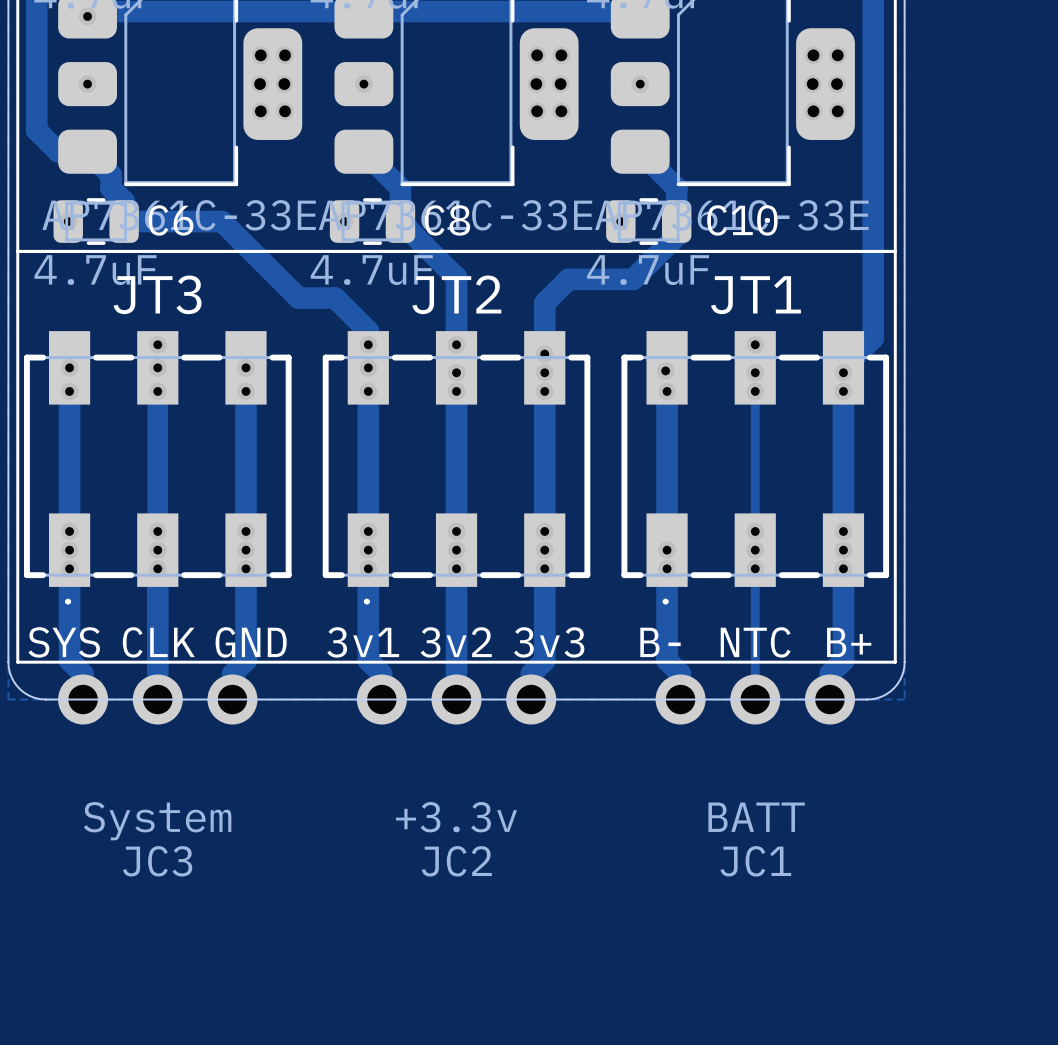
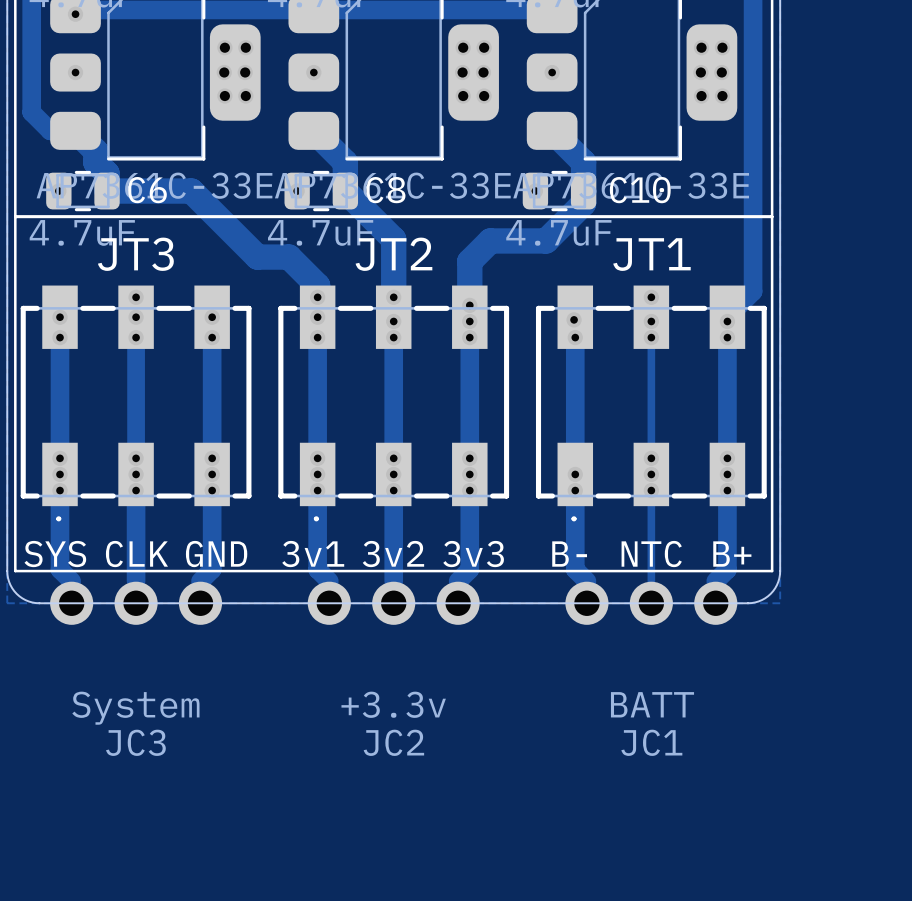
track width: thin (87, 151) (111, 175) (111, 188) (124, 201) (124, 221) (222, 221) (298, 298) (335, 298) (368, 331) (368, 367) -> thick (75, 130) (95, 151) (95, 162) (107, 173) (107, 191) (191, 191) (257, 257) (289, 257) (317, 285) (317, 317)
track width: thin (363, 151) (400, 188) (400, 221) (456, 277) (456, 367) -> thick (313, 130) (345, 162) (345, 191) (393, 239) (393, 317)
track width: thin (640, 151) (676, 188) (676, 235) (633, 279) (568, 279) (544, 303) (544, 367) -> thick (552, 130) (583, 162) (583, 203) (546, 240) (490, 240) (469, 261) (469, 317)

